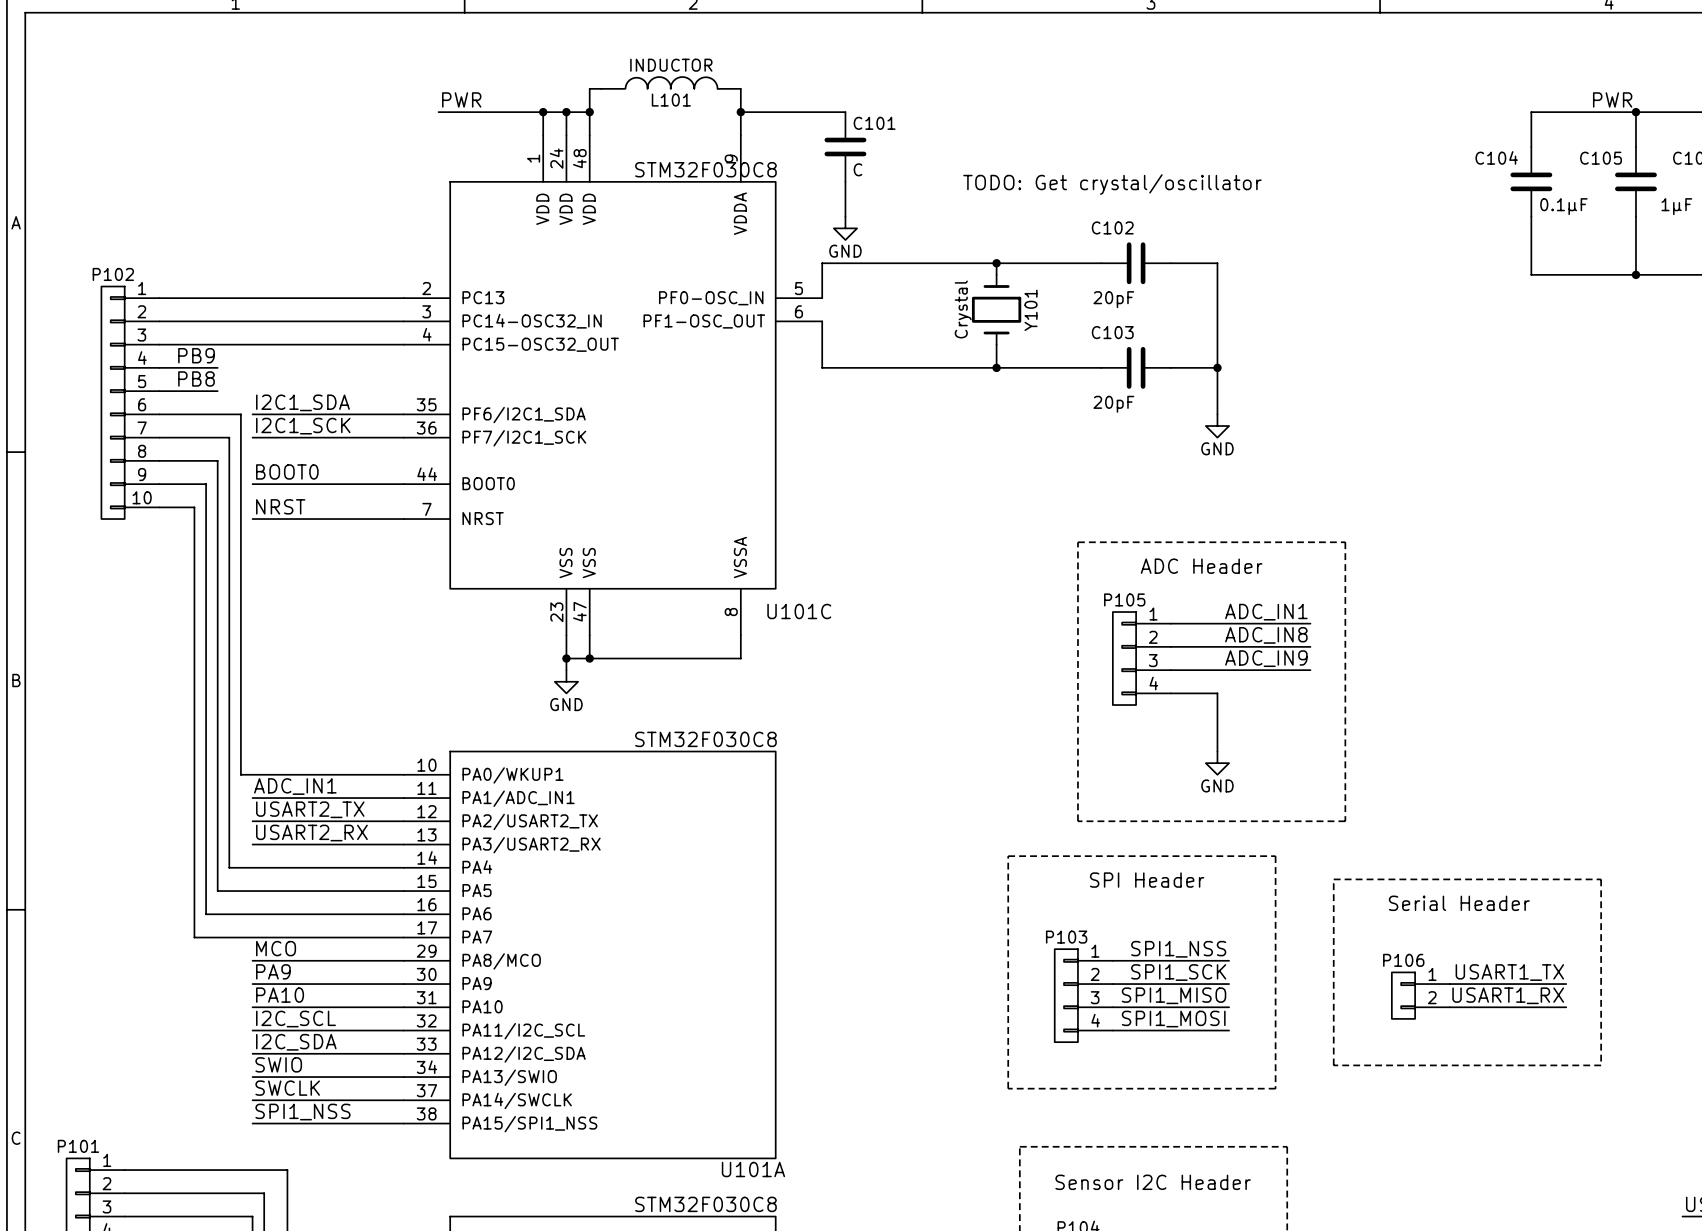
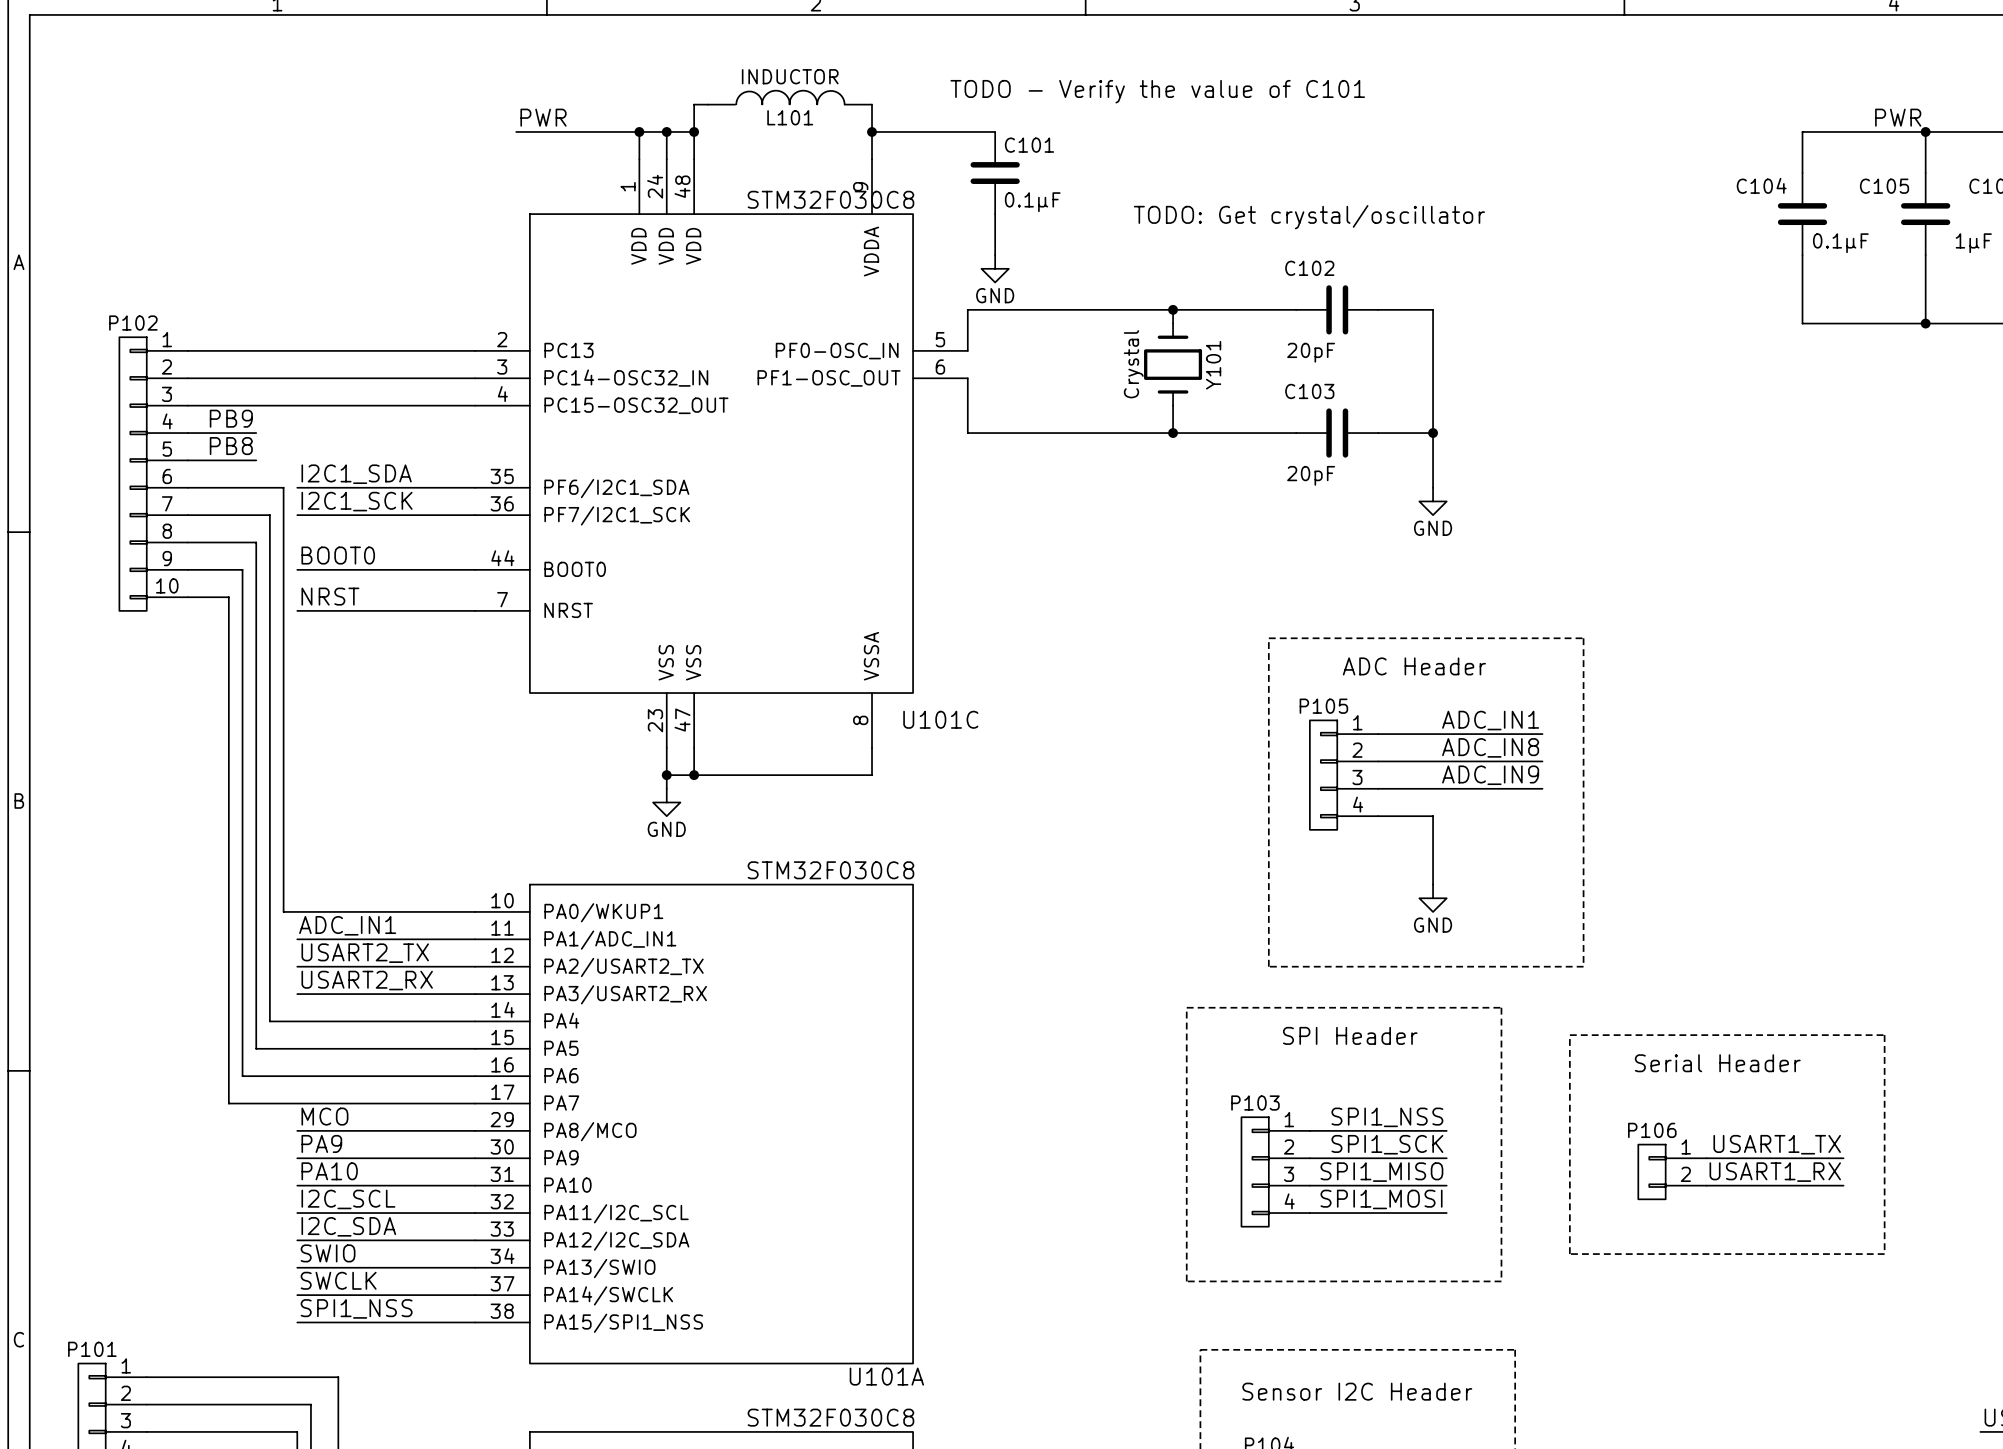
text: none -> TODO - Verify the value of C101 (1157, 91)
C101 value: C (858, 169) -> 0.1μF (1032, 202)

